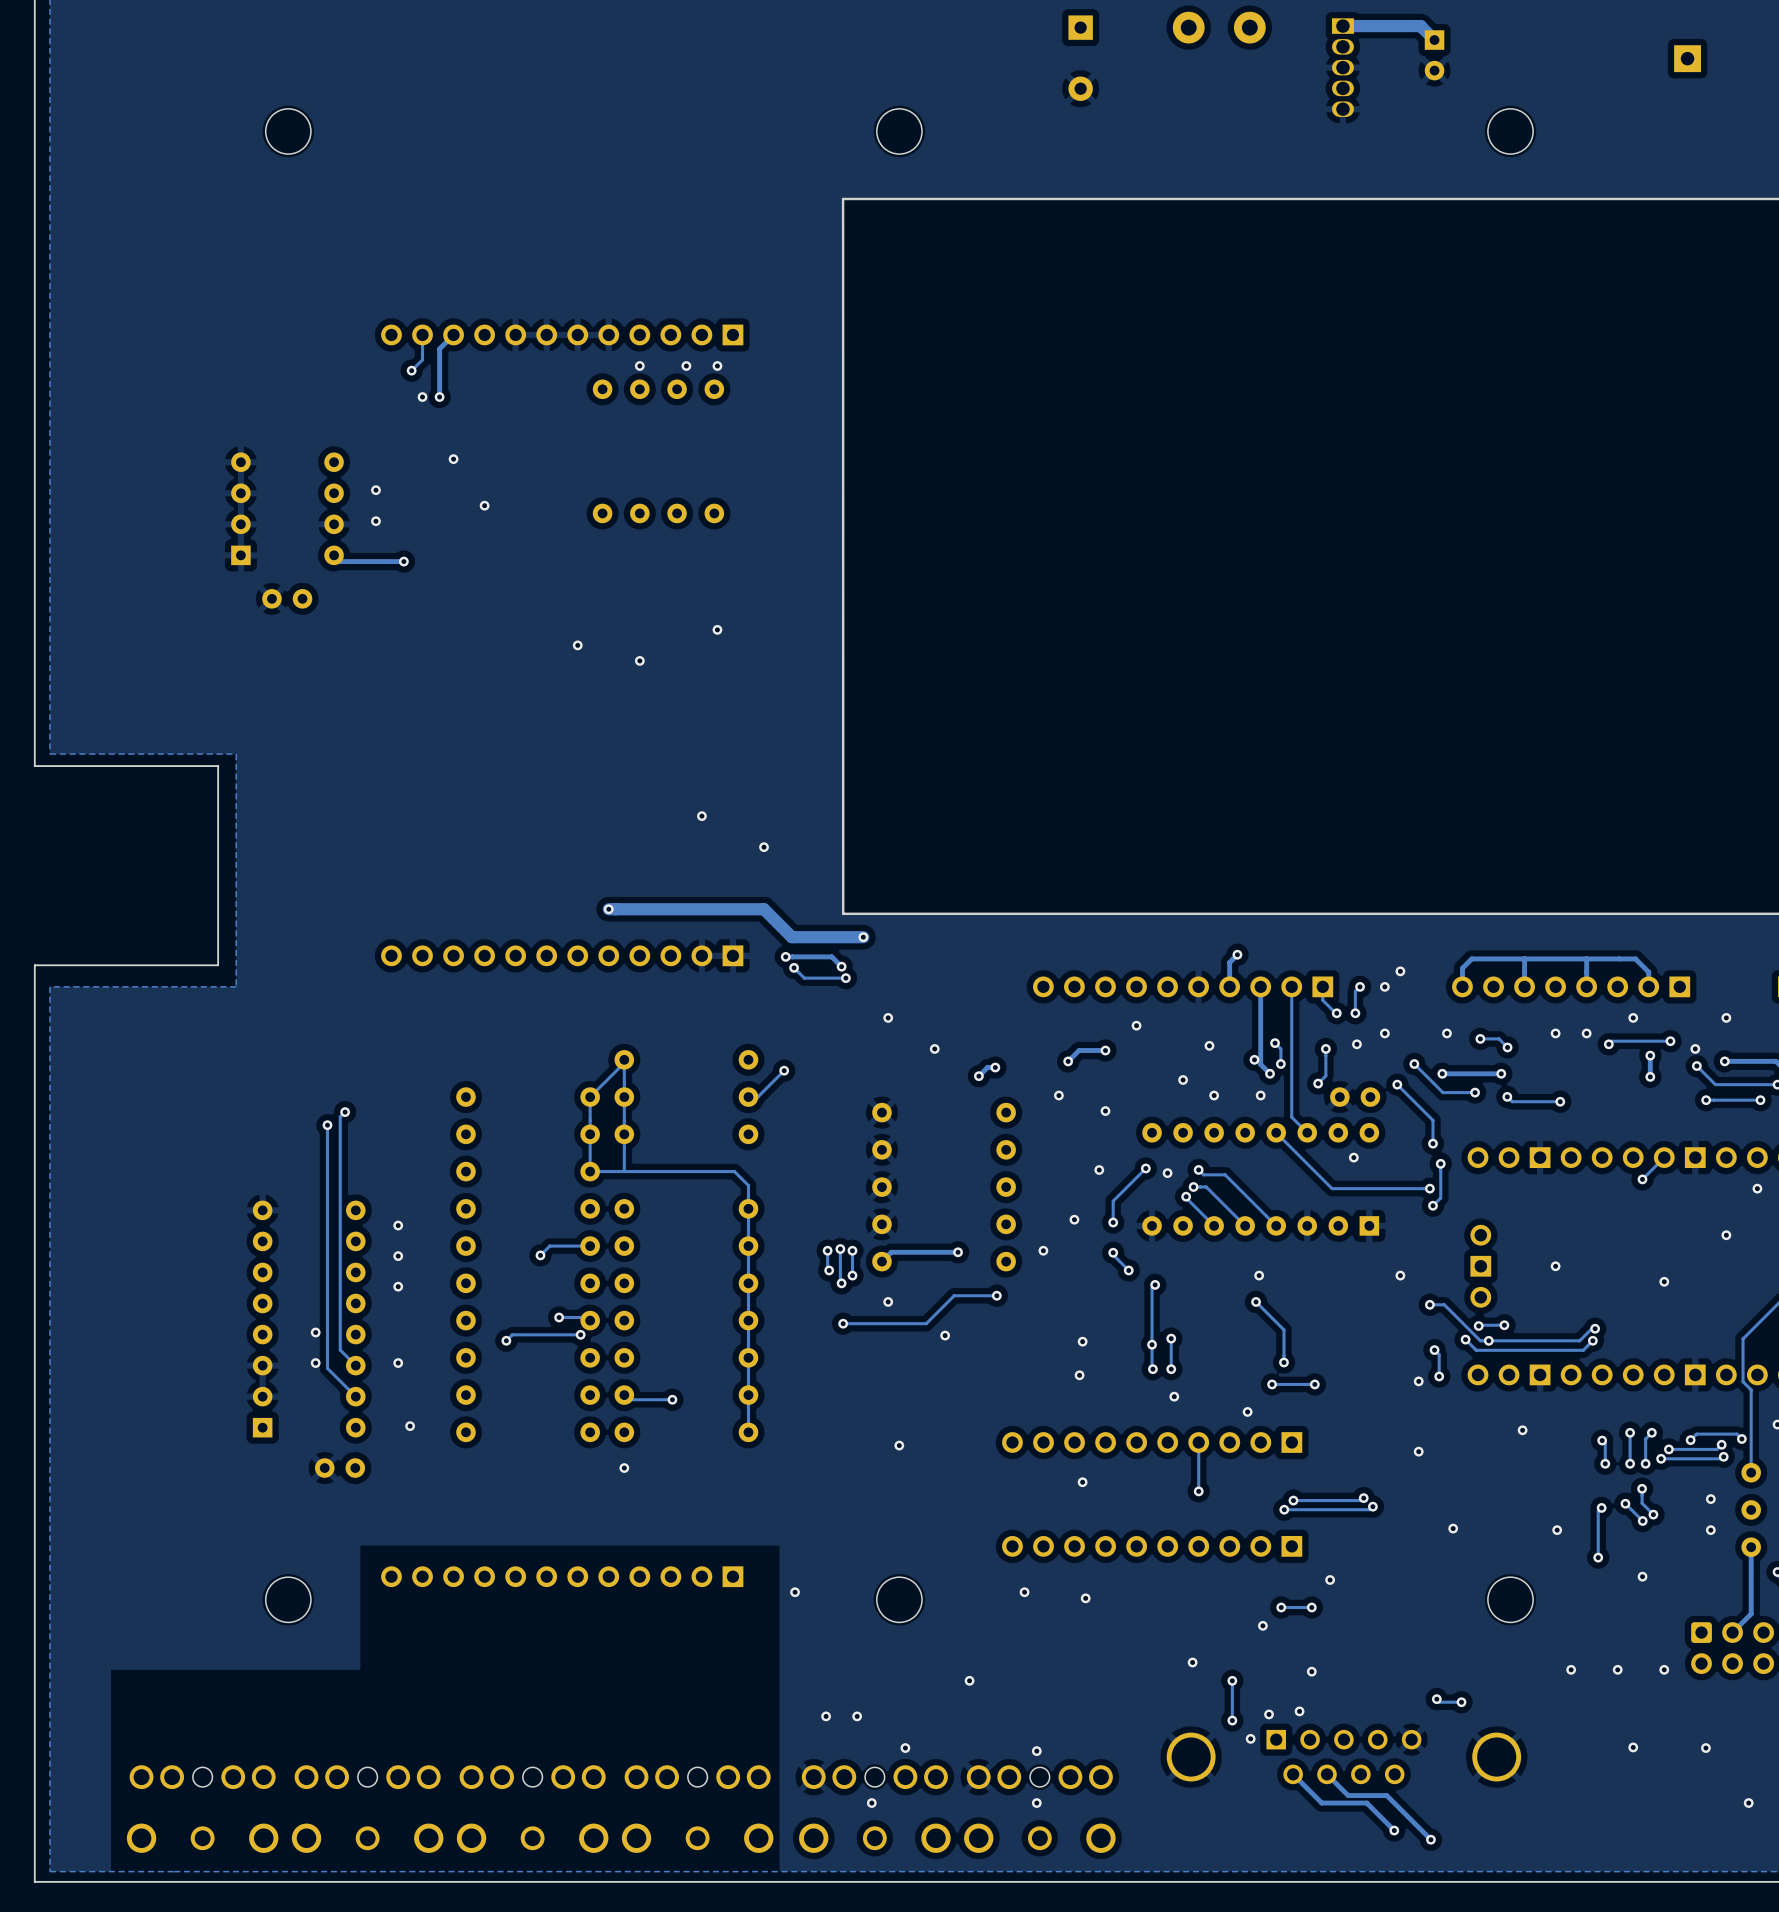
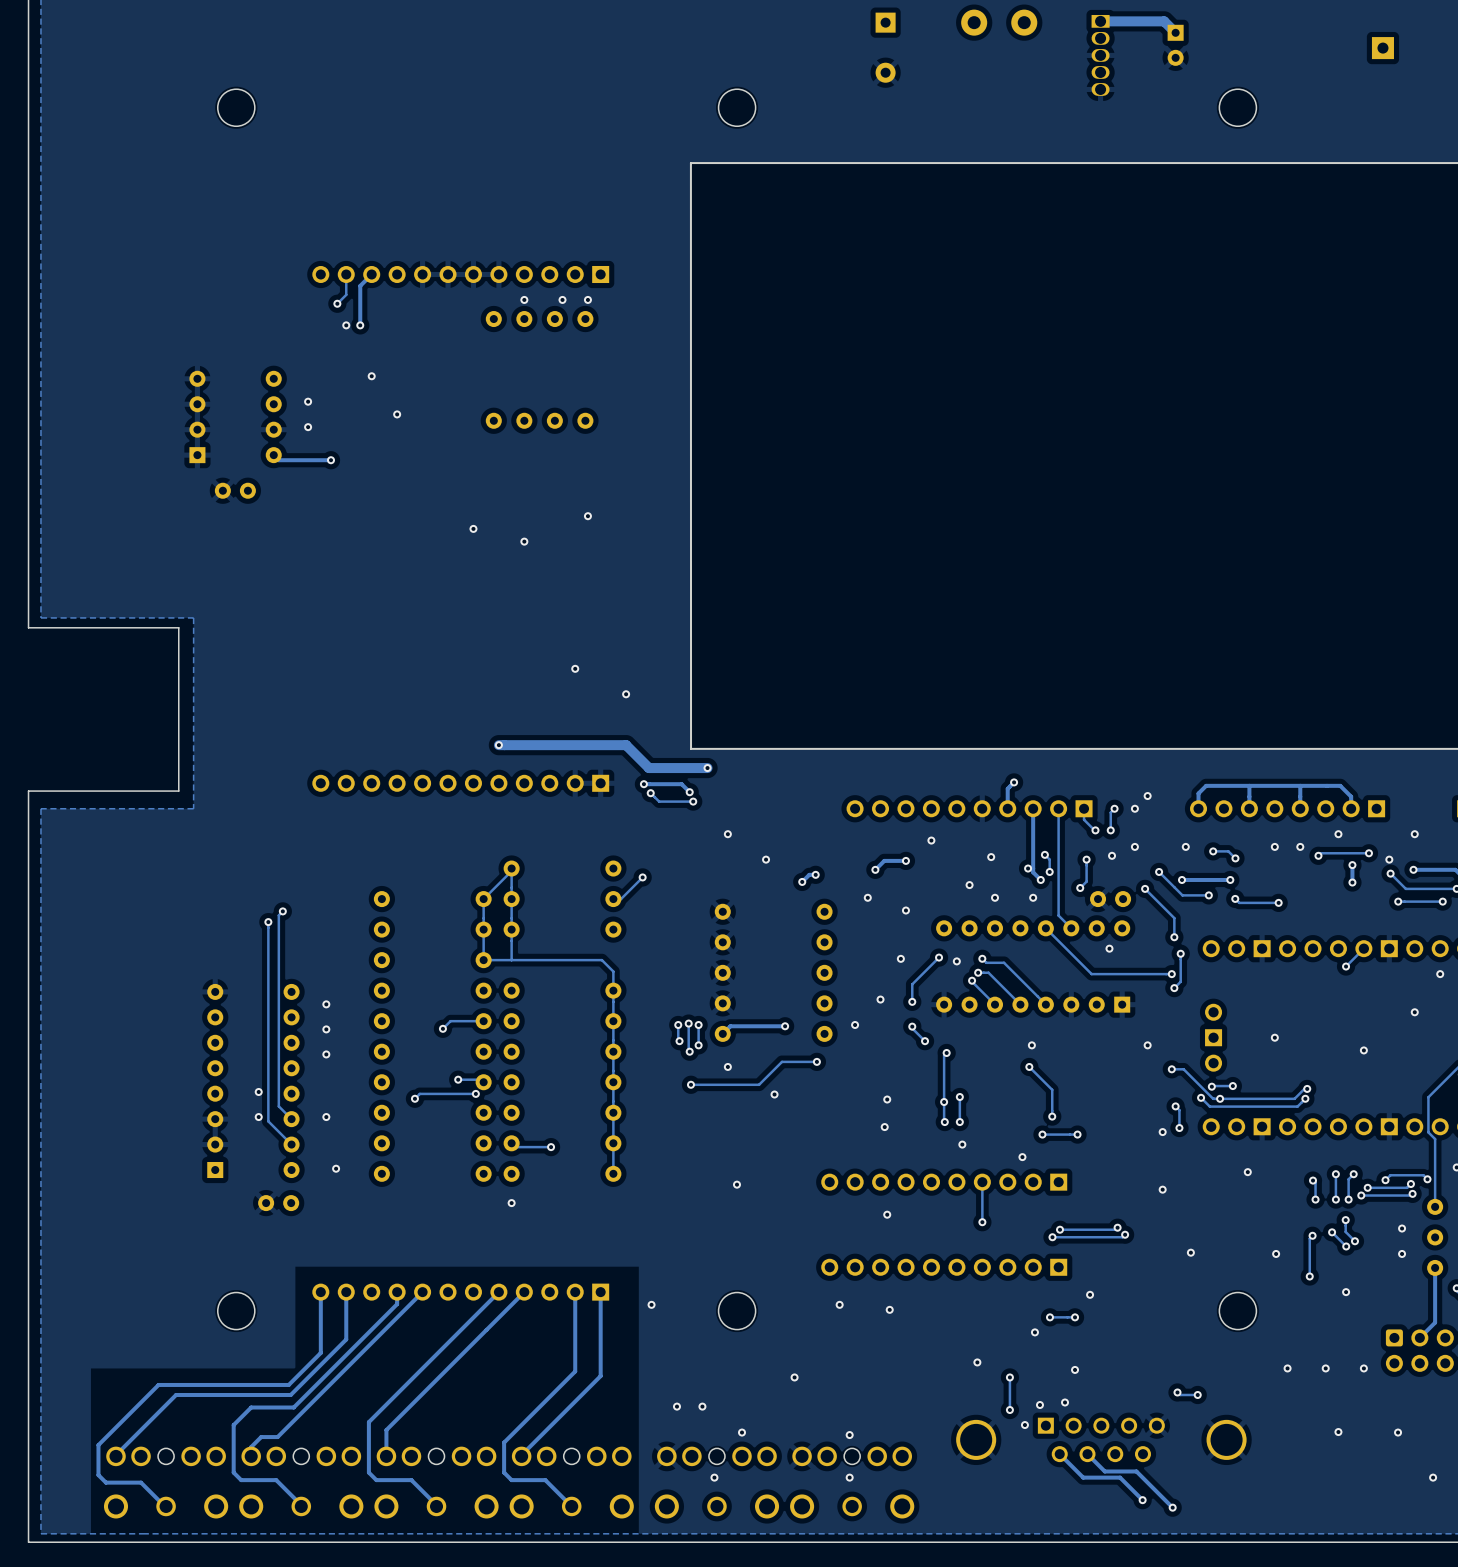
track: none -> (320, 1292) (320, 1352) (288, 1384) (158, 1384) (98, 1445) (98, 1475) (105, 1482) (141, 1482) (166, 1507)
track: none -> (346, 1292) (346, 1339) (290, 1394) (176, 1394) (115, 1455)
track: none -> (397, 1292) (397, 1304) (293, 1407) (251, 1407) (233, 1425) (233, 1472) (241, 1480) (276, 1480) (301, 1505)
track: none -> (422, 1292) (277, 1437) (261, 1437) (251, 1447) (251, 1456)
track: none -> (498, 1292) (368, 1422) (368, 1472) (376, 1480) (411, 1480) (436, 1505)
track: none -> (524, 1292) (386, 1430) (386, 1455)
track: none -> (575, 1292) (575, 1371) (504, 1442) (504, 1472) (511, 1480) (545, 1480) (571, 1506)
track: none -> (600, 1292) (600, 1376) (521, 1455)

